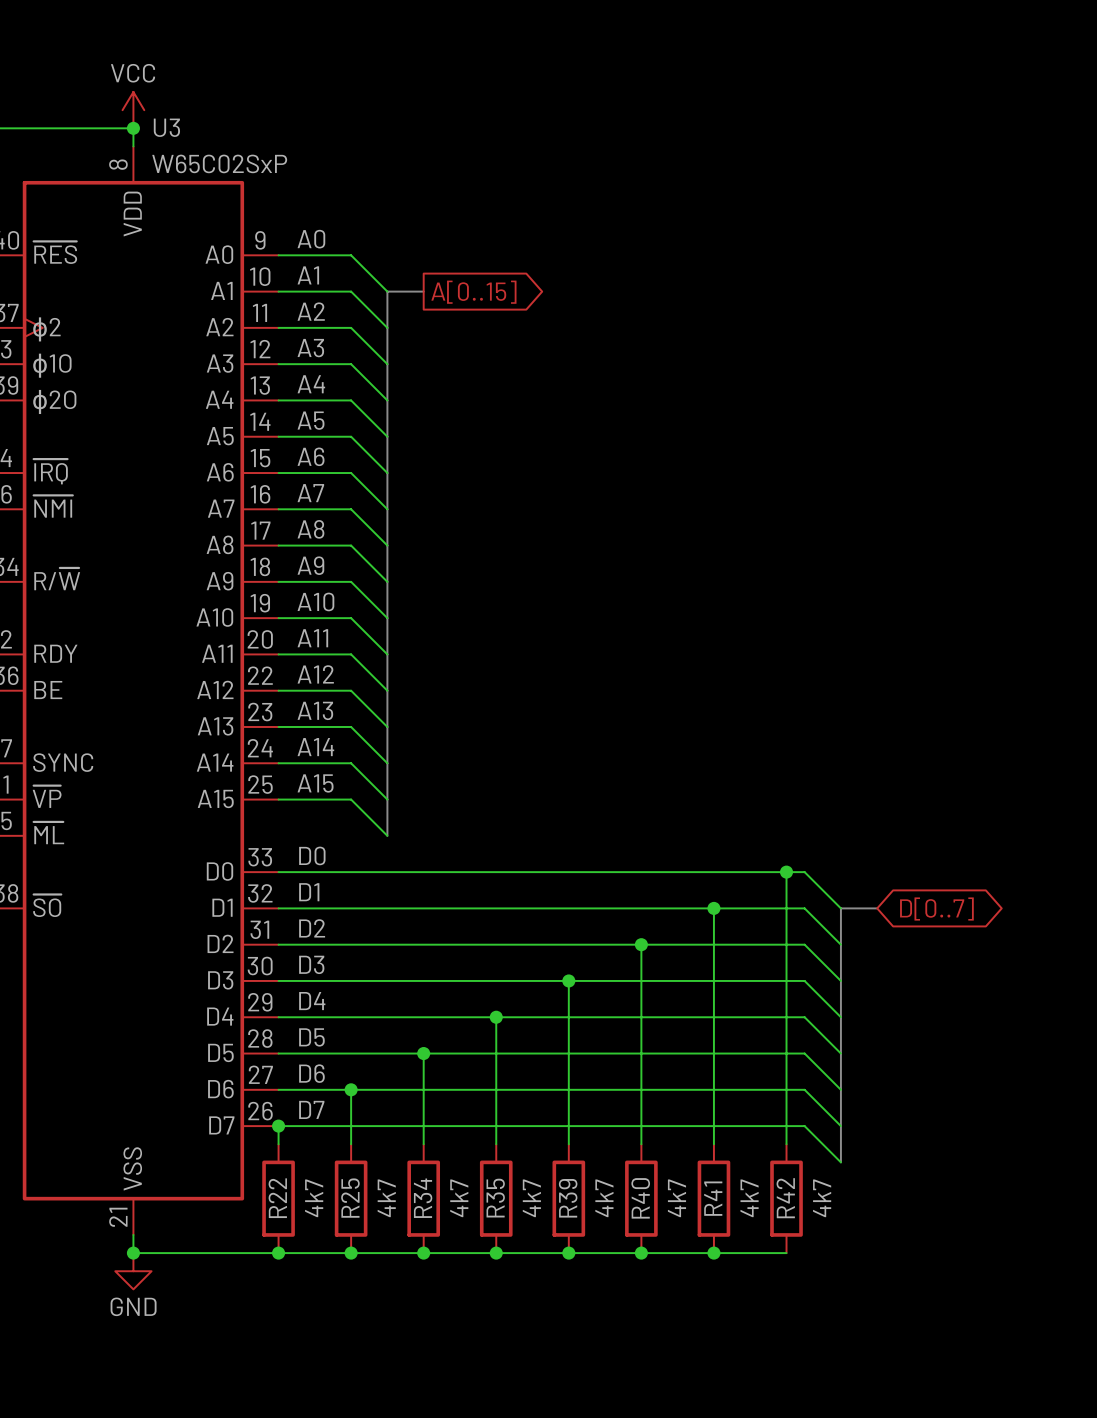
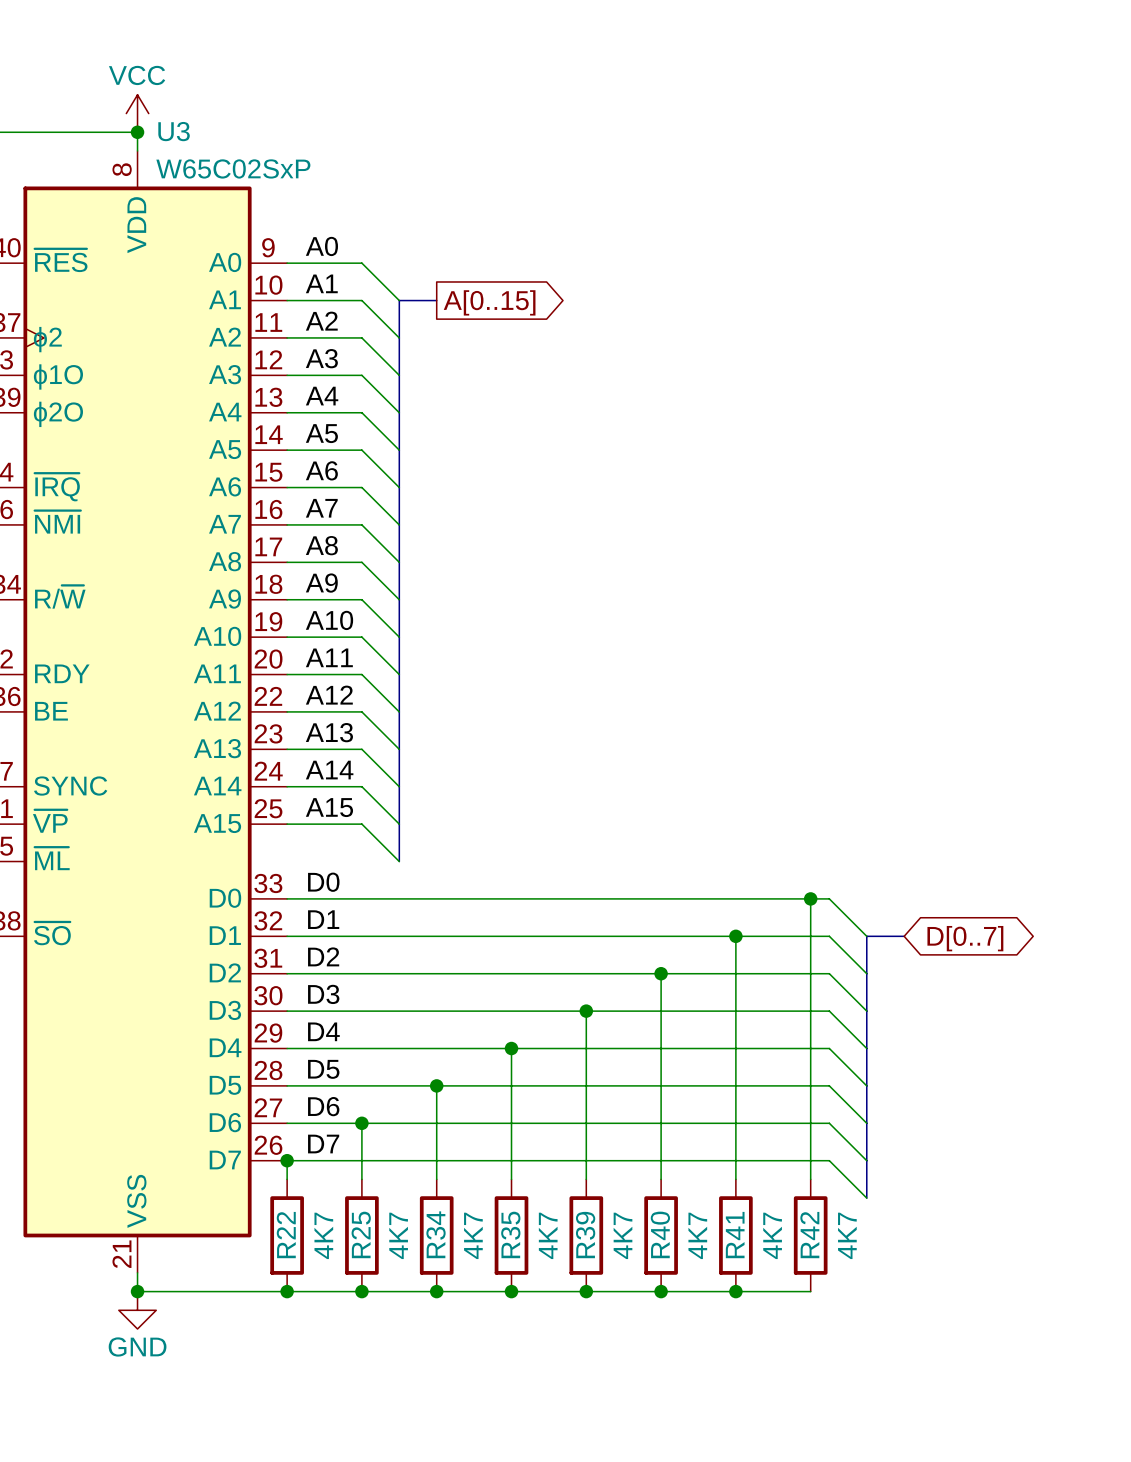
R22 value: 4k7 (314, 1198) -> 4K7 (323, 1235)
R25 value: 4k7 (386, 1198) -> 4K7 (398, 1235)
R34 value: 4k7 (459, 1198) -> 4K7 (473, 1235)
R35 value: 4k7 (531, 1198) -> 4K7 (548, 1235)
R39 value: 4k7 (604, 1198) -> 4K7 (623, 1235)
R40 value: 4k7 (676, 1198) -> 4K7 (697, 1235)
R41 value: 4k7 (749, 1198) -> 4K7 (772, 1235)
R42 value: 4k7 (822, 1198) -> 4K7 (847, 1235)

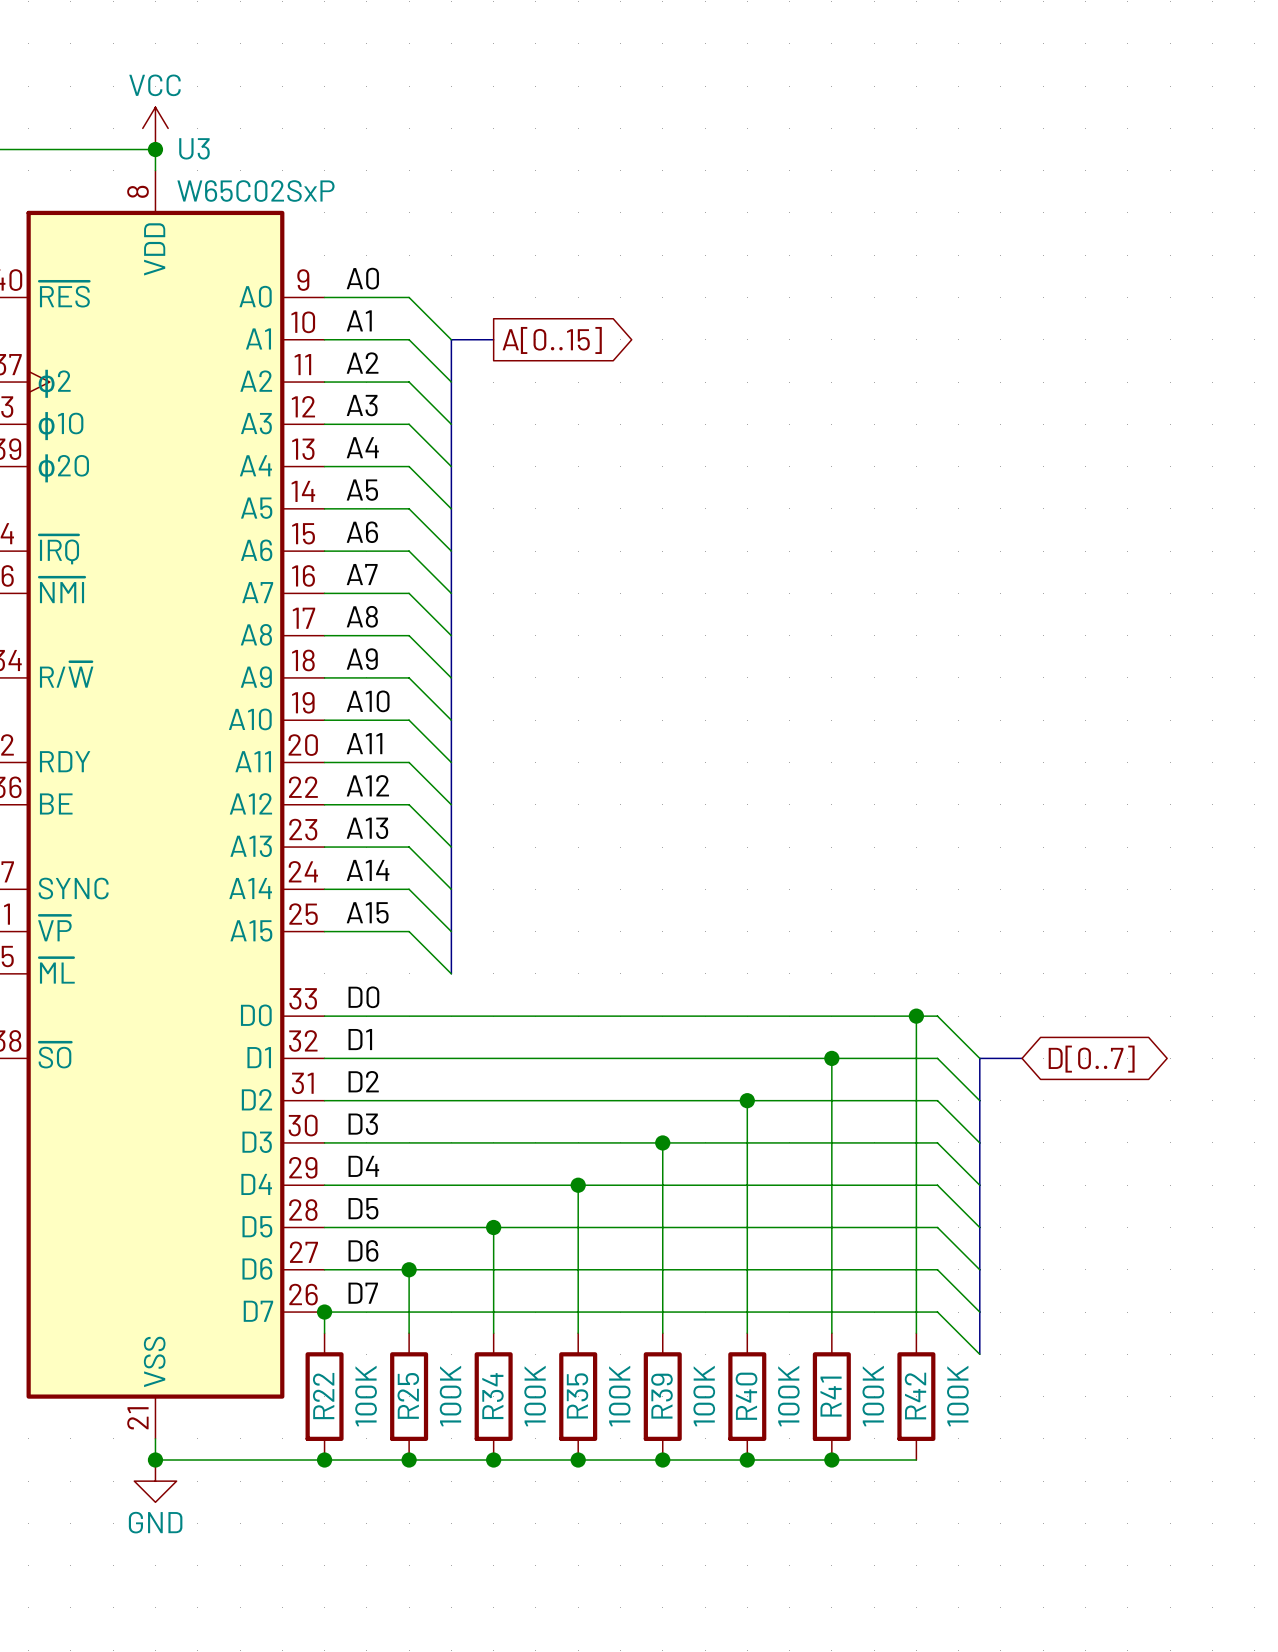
R22 value: 4K7 (323, 1235) -> 100K (366, 1396)
R25 value: 4K7 (398, 1235) -> 100K (450, 1396)
R34 value: 4K7 (473, 1235) -> 100K (535, 1396)
R35 value: 4K7 (548, 1235) -> 100K (619, 1396)
R39 value: 4K7 (623, 1235) -> 100K (704, 1396)
R40 value: 4K7 (697, 1235) -> 100K (788, 1396)
R41 value: 4K7 (772, 1235) -> 100K (873, 1396)
R42 value: 4K7 (847, 1235) -> 100K (957, 1396)

